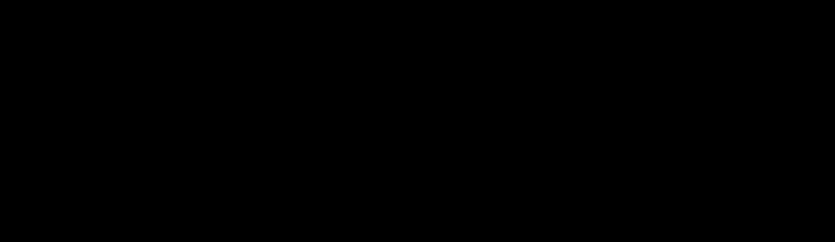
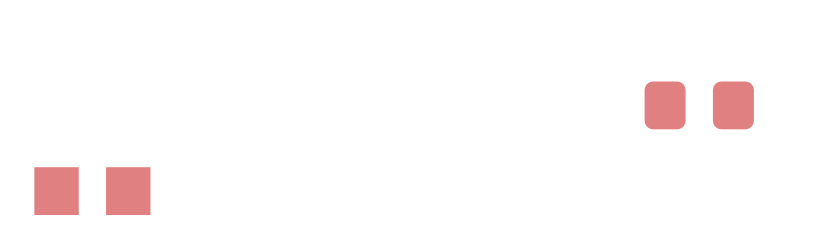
part: none -> (699, 105)
part: none -> (92, 191)

